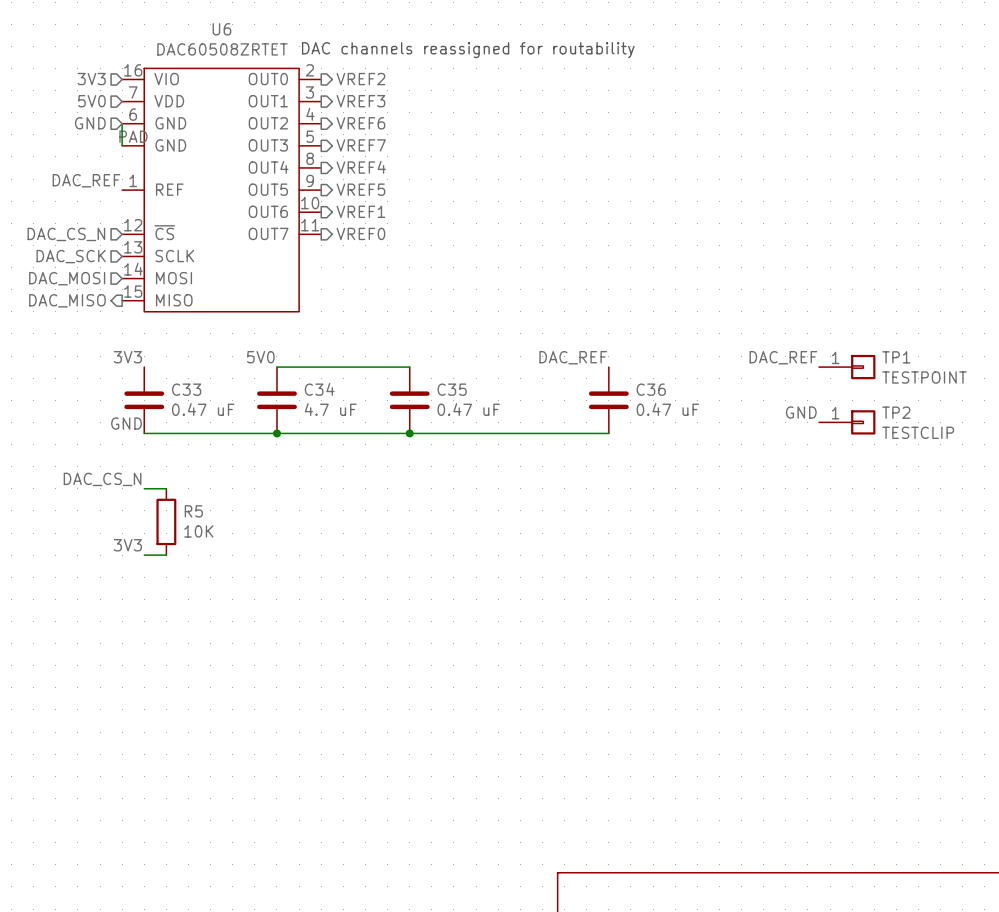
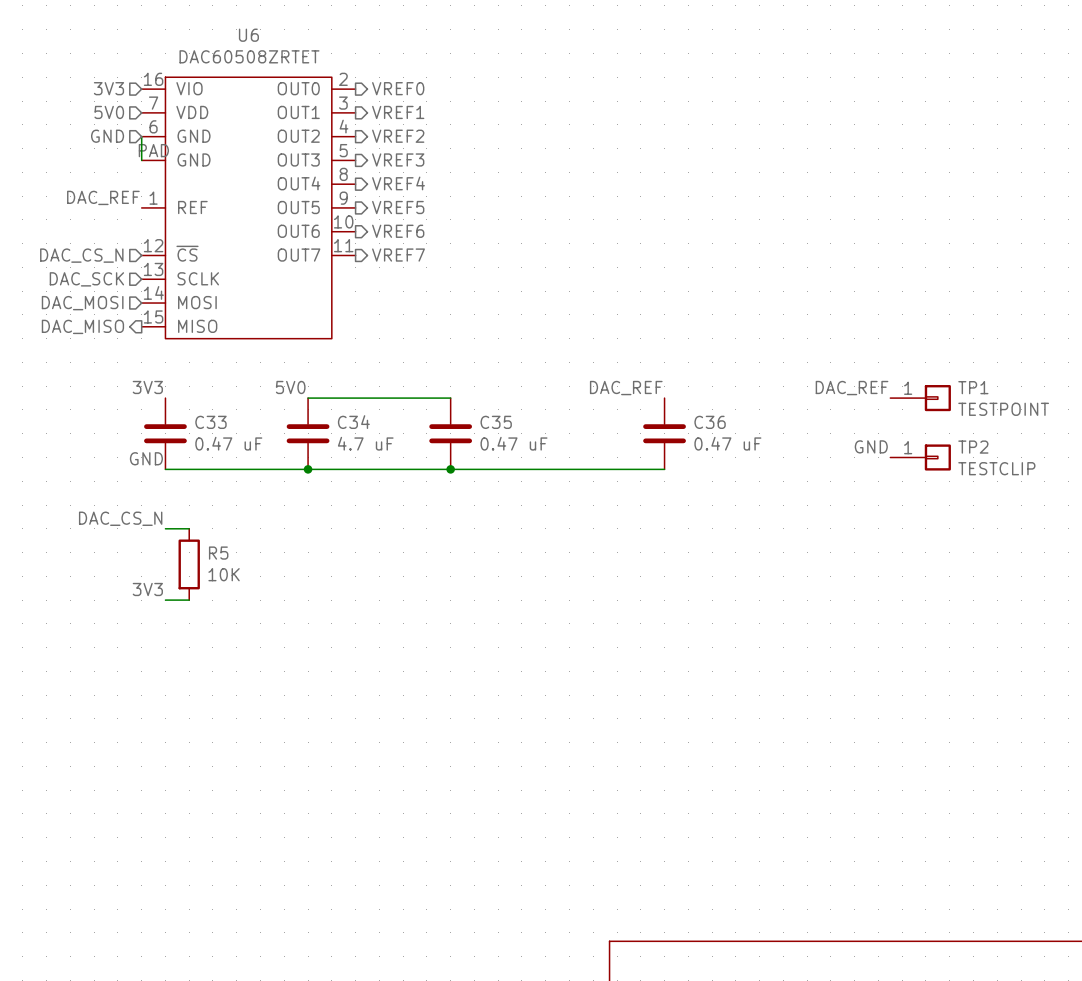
text: DAC channels reassigned for routability (468, 50) -> none
hierarchical label: VREF2 (360, 79) -> VREF0 (398, 88)
hierarchical label: VREF3 (360, 101) -> VREF1 (398, 112)
hierarchical label: VREF6 (360, 123) -> VREF2 (398, 136)
hierarchical label: VREF7 (361, 145) -> VREF3 (398, 159)
hierarchical label: VREF1 (360, 211) -> VREF6 (398, 231)
hierarchical label: VREF0 (360, 233) -> VREF7 (398, 255)

